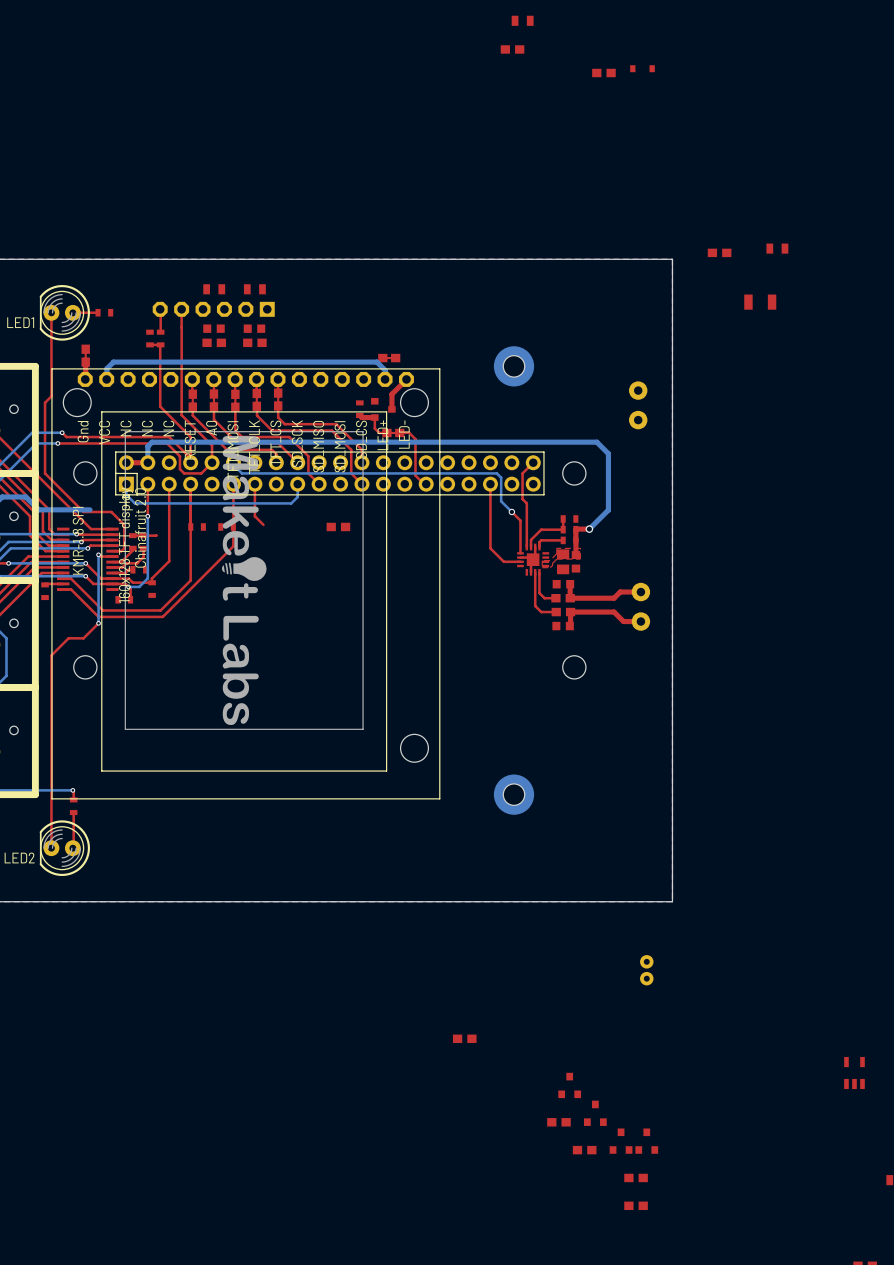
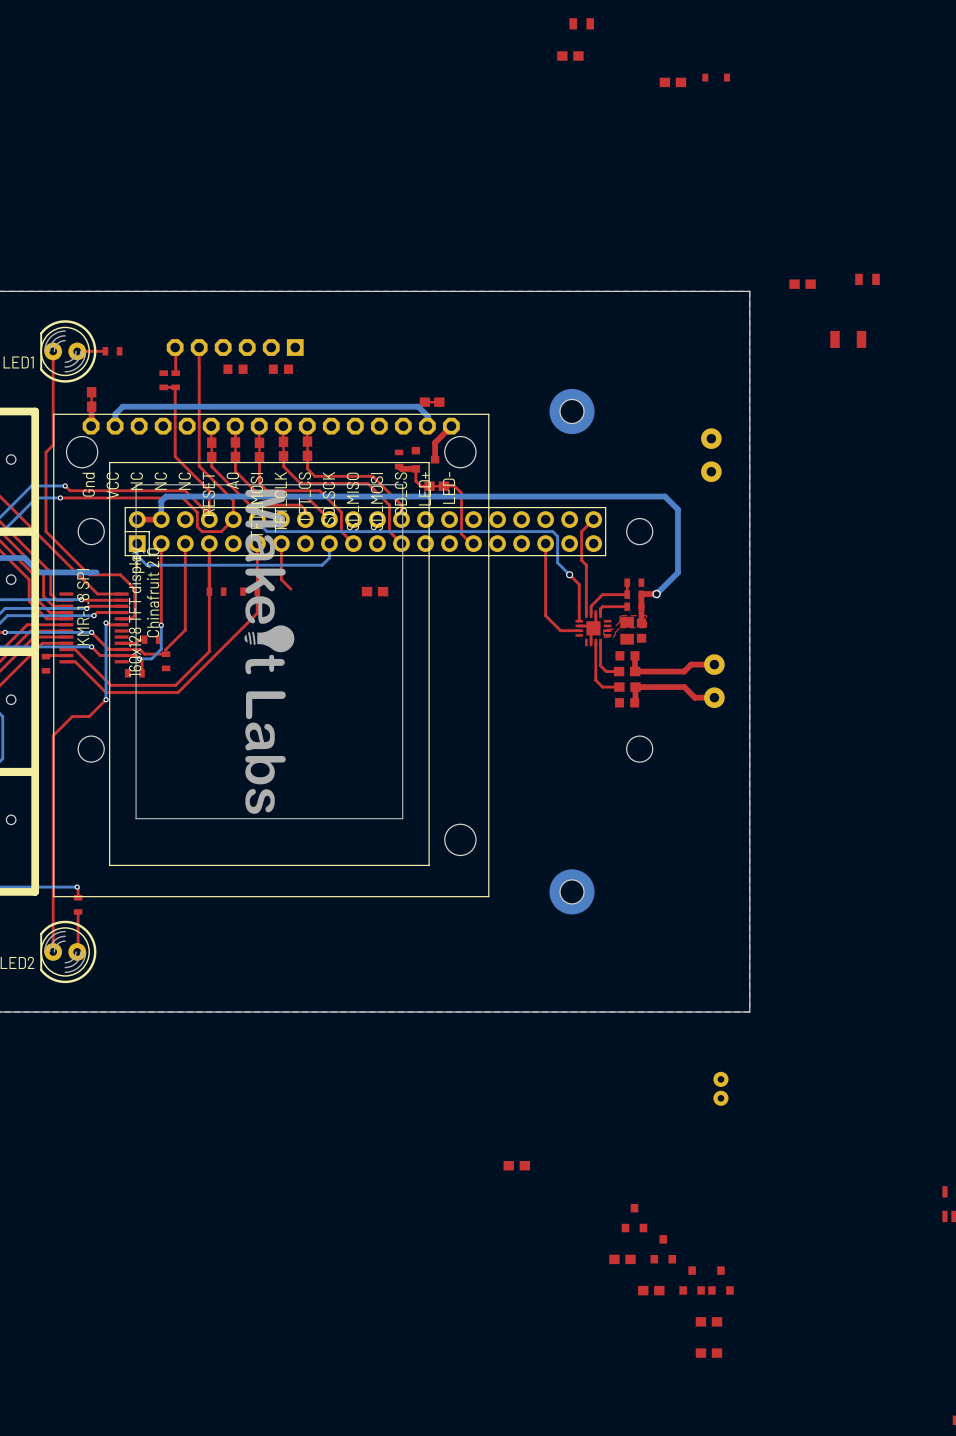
part: (214, 289) -> none
part: (254, 289) -> none
part: (214, 342) -> none
part: (254, 342) -> none
top track: none -> (161, 579) (161, 625)
bottom track: (147, 516) (147, 556) -> none
via position: (147, 516) -> (161, 625)
top track: (156, 535) (132, 535) -> none
part: (132, 541) -> none
part: (143, 541) -> none
top track: (132, 548) (121, 562) (112, 562) -> none
top track: (143, 548) (143, 556) (137, 563) (126, 563) (122, 567) (112, 567) -> none

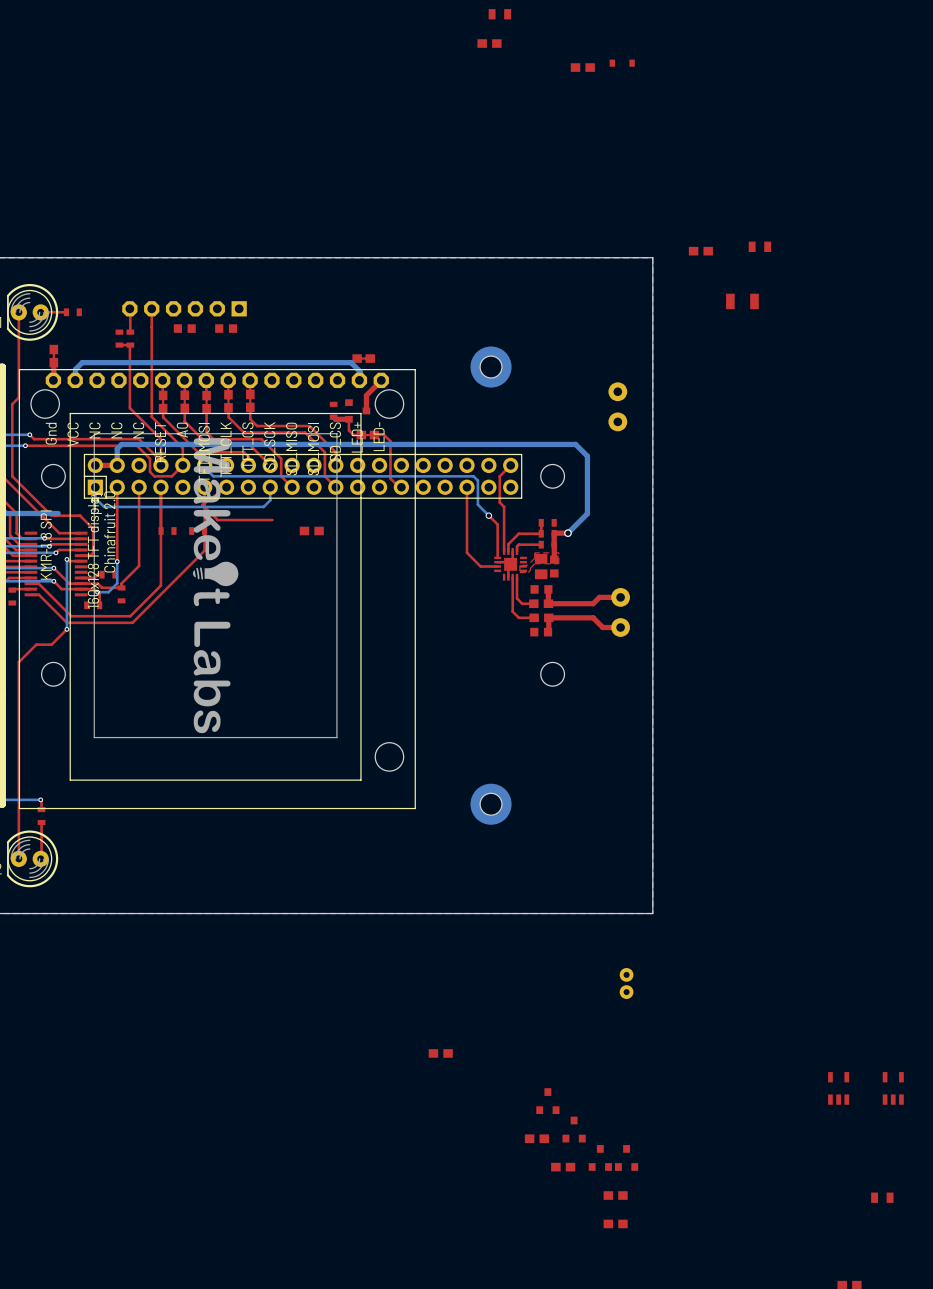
top track: (281, 543) (281, 579) (290, 589) -> (226, 487) (202, 504) (217, 520) (272, 520)

